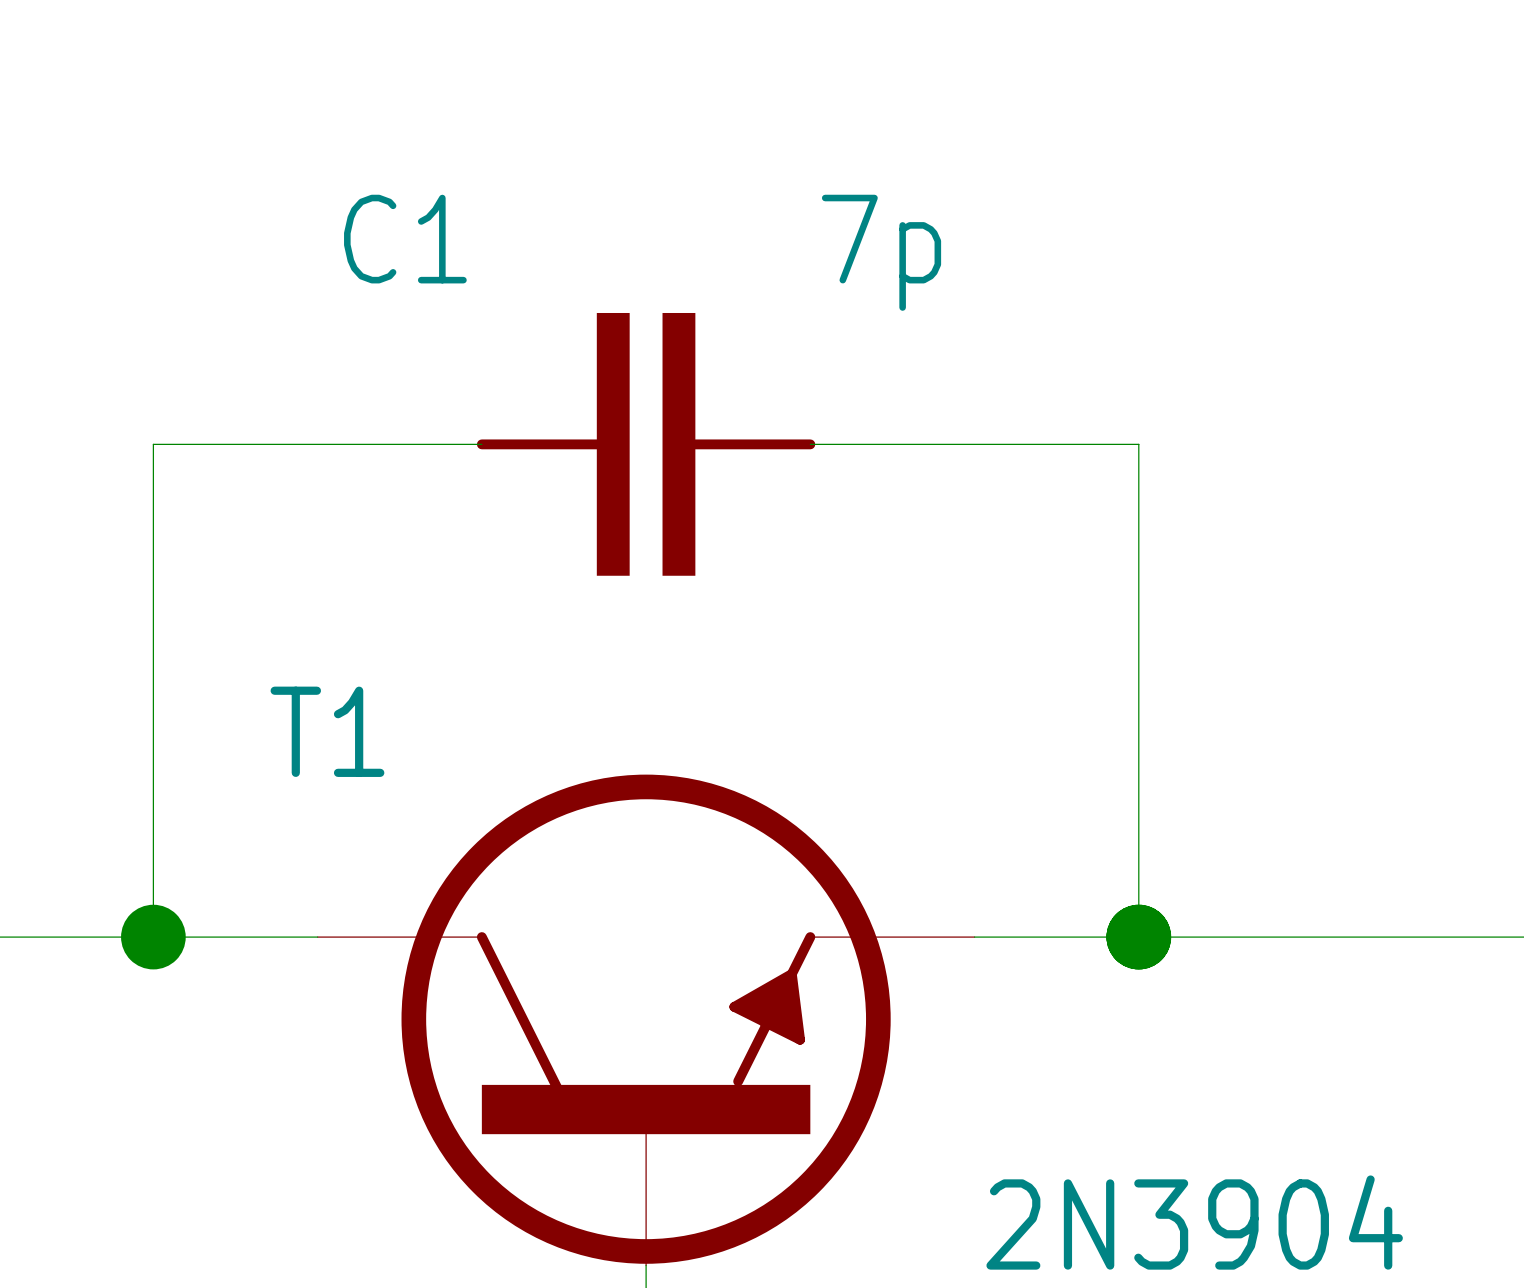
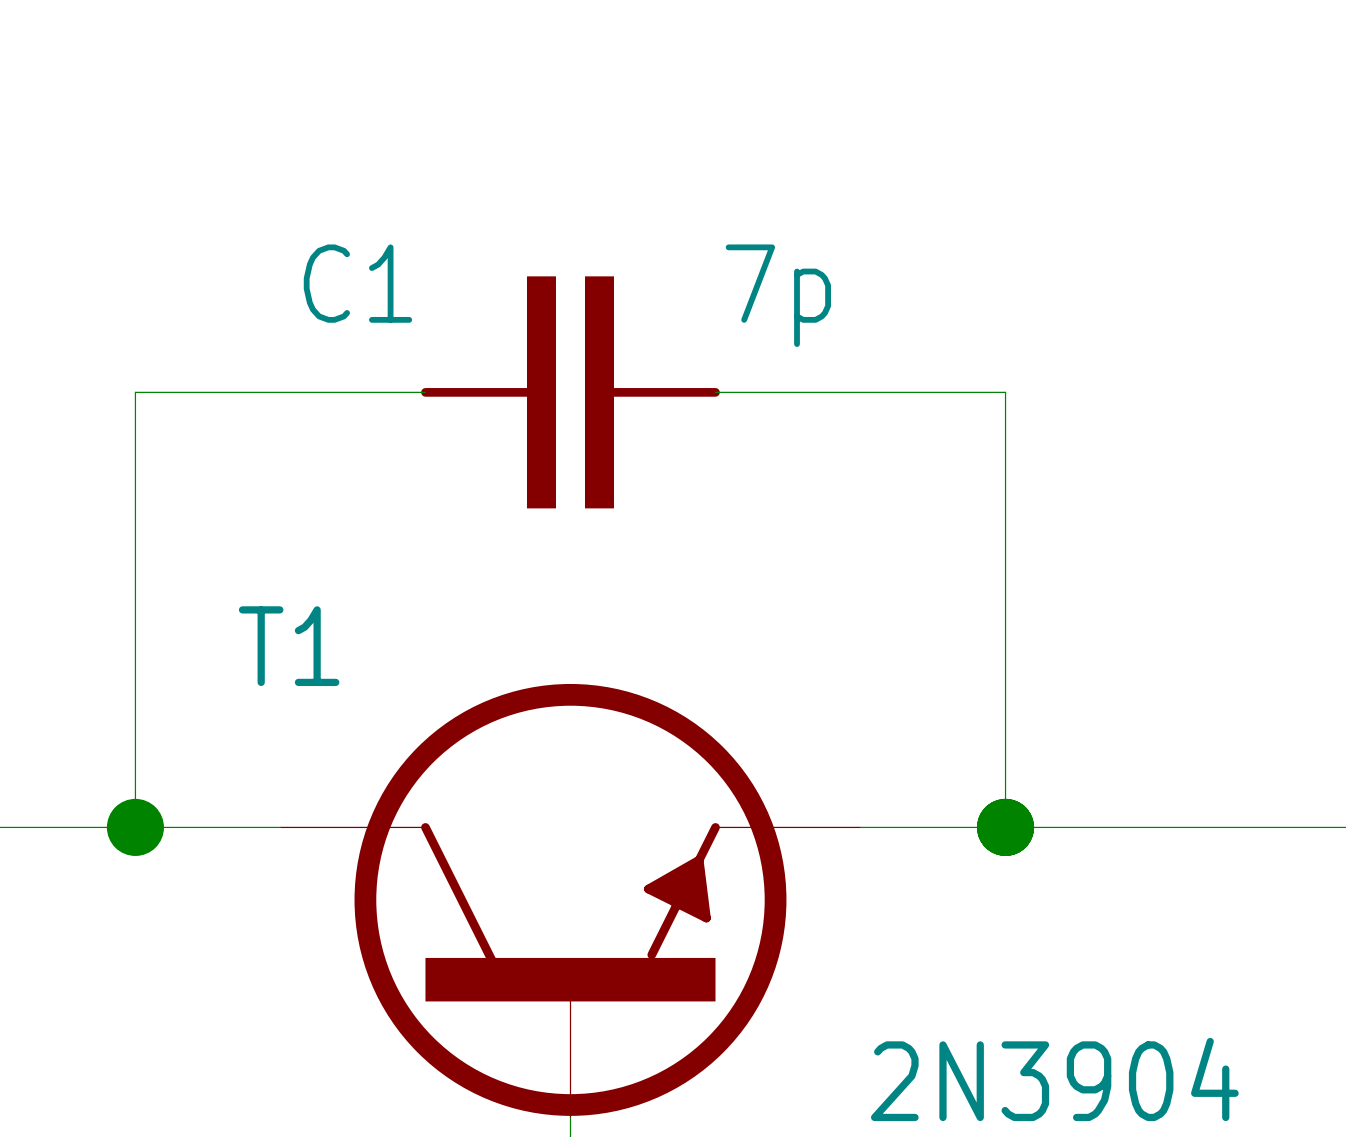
C1 name position: C1 (405, 239) -> C1 (357, 283)
C1 value position: 7p (881, 252) -> 7p (778, 295)

